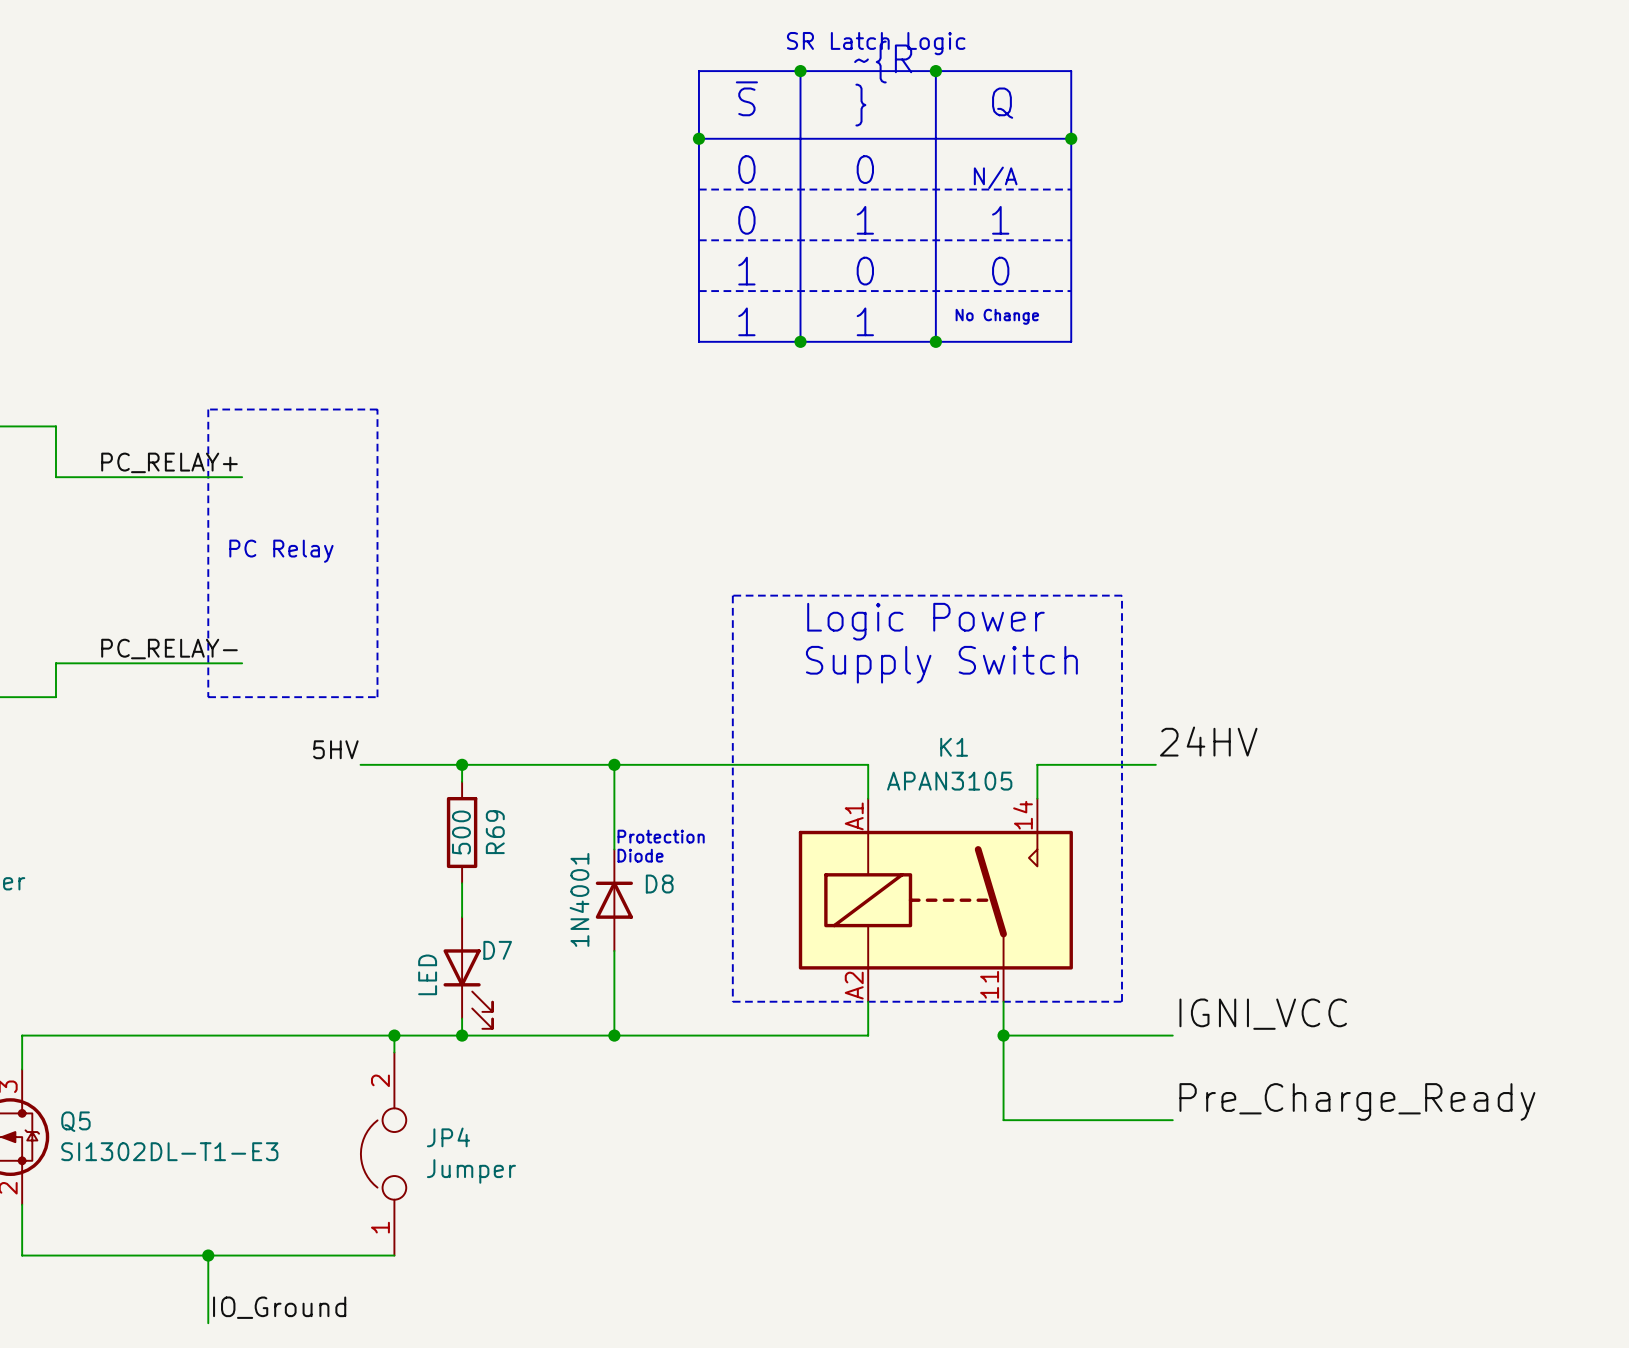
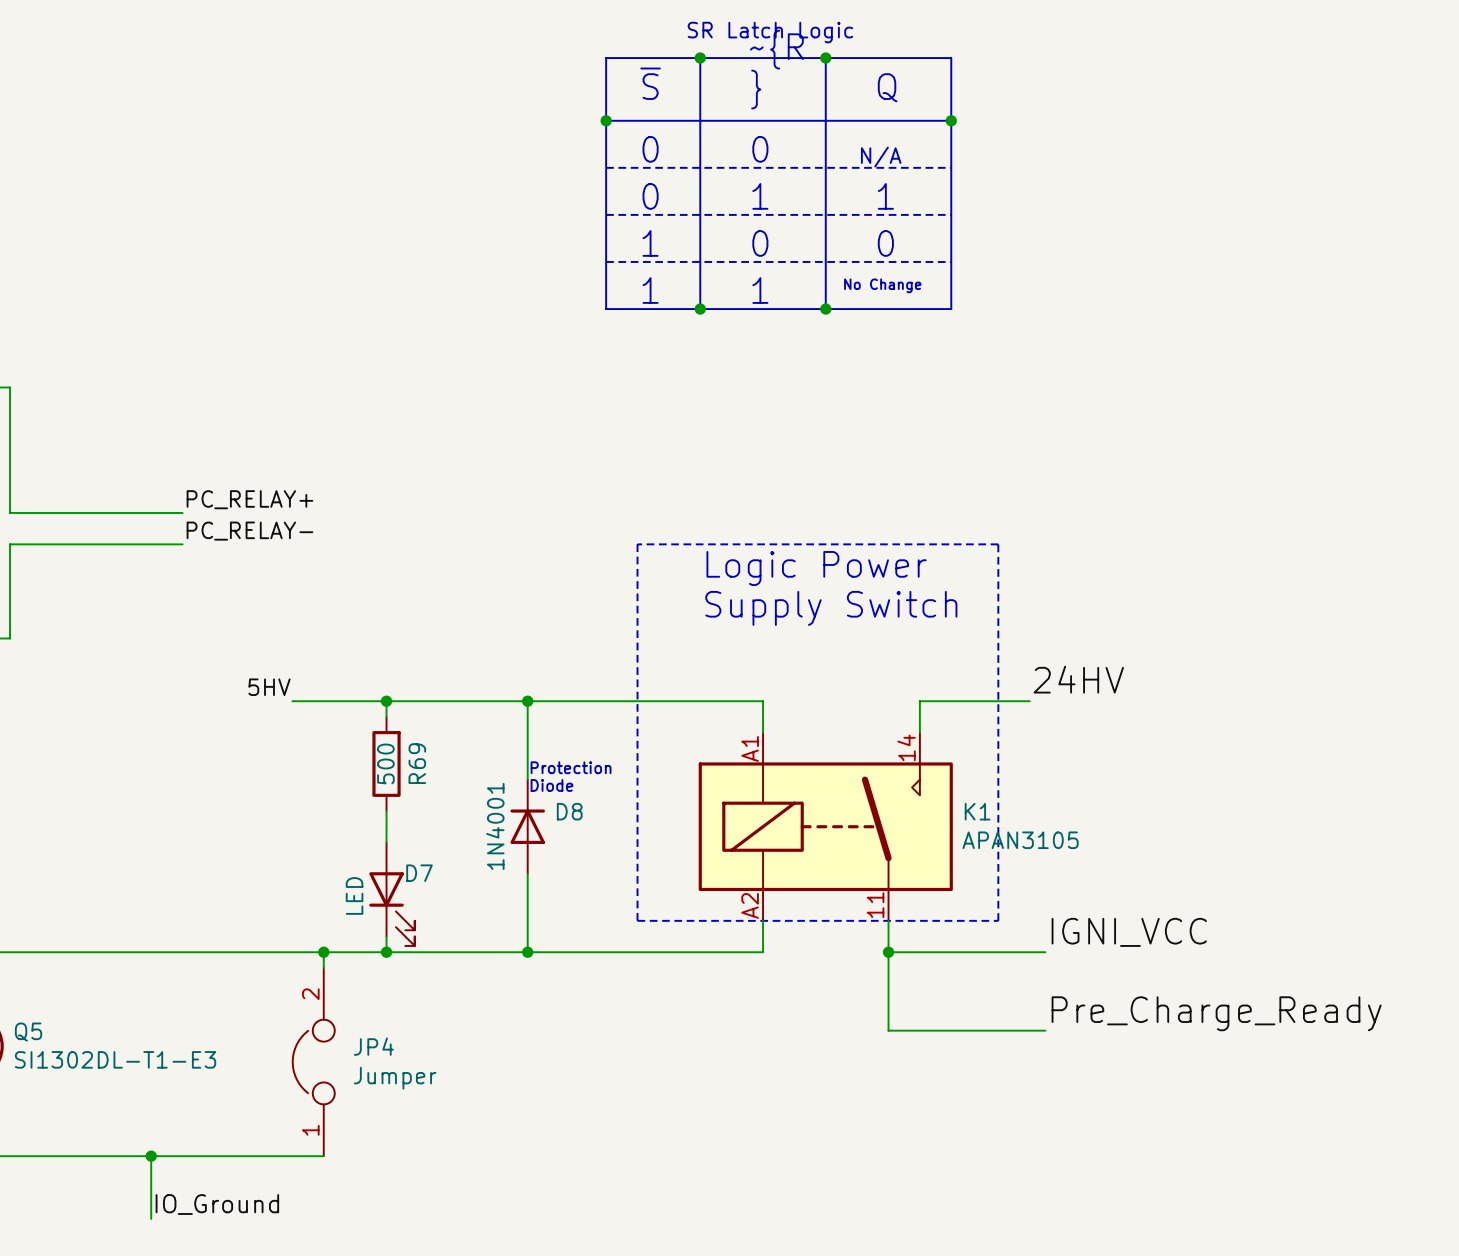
line: (208, 409) (208, 697) (377, 697) (377, 409) (208, 409) -> none
label position: PC_RELAY+ (169, 462) -> PC_RELAY+ (249, 499)
wire: (55, 477) (242, 477) -> (10, 434) (10, 512) (182, 512)
text: PC Relay (281, 551) -> none
label position: PC_RELAY- (169, 649) -> PC_RELAY- (249, 531)
wire: (55, 663) (242, 663) -> (10, 607) (10, 544) (182, 544)
K1 name position: K1 (954, 747) -> K1 (977, 811)
K1 value position: APAN3105 (949, 781) -> APAN3105 (1020, 840)

